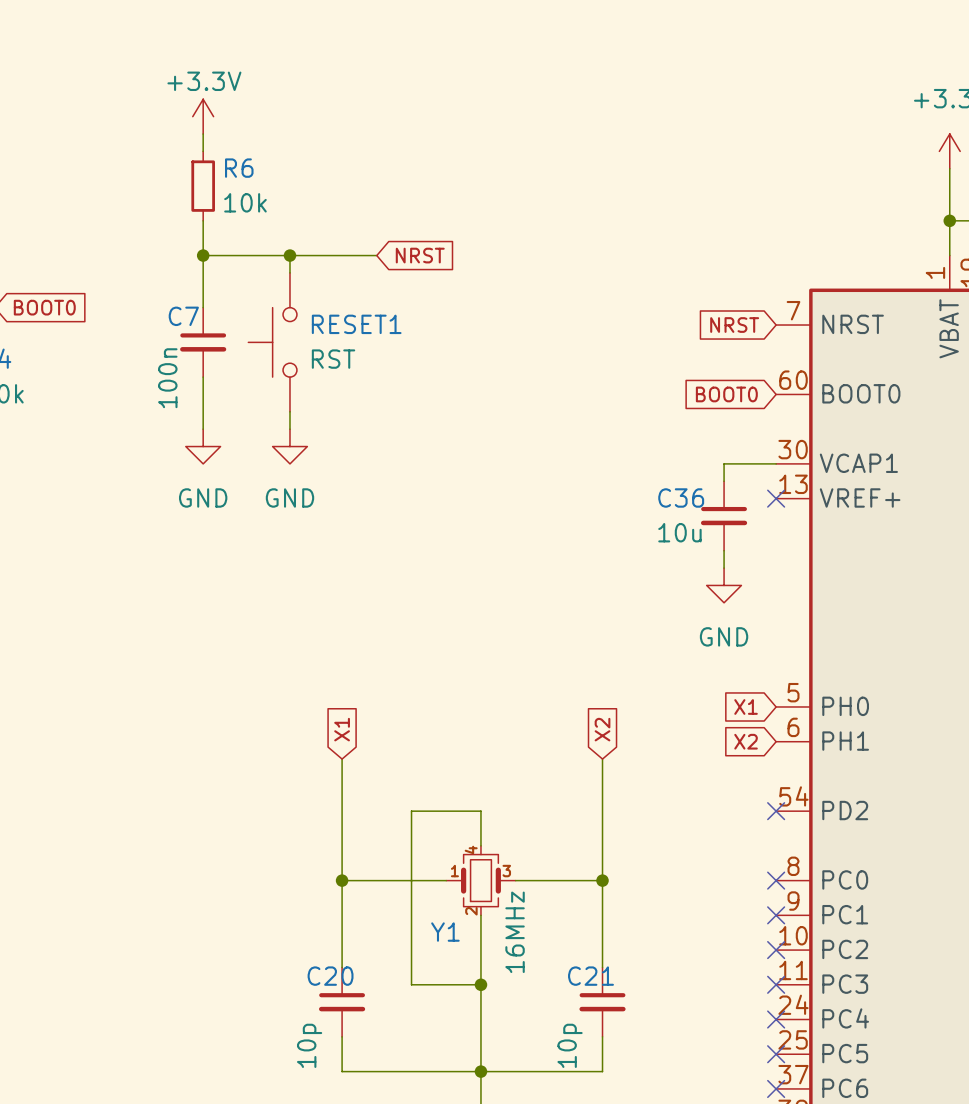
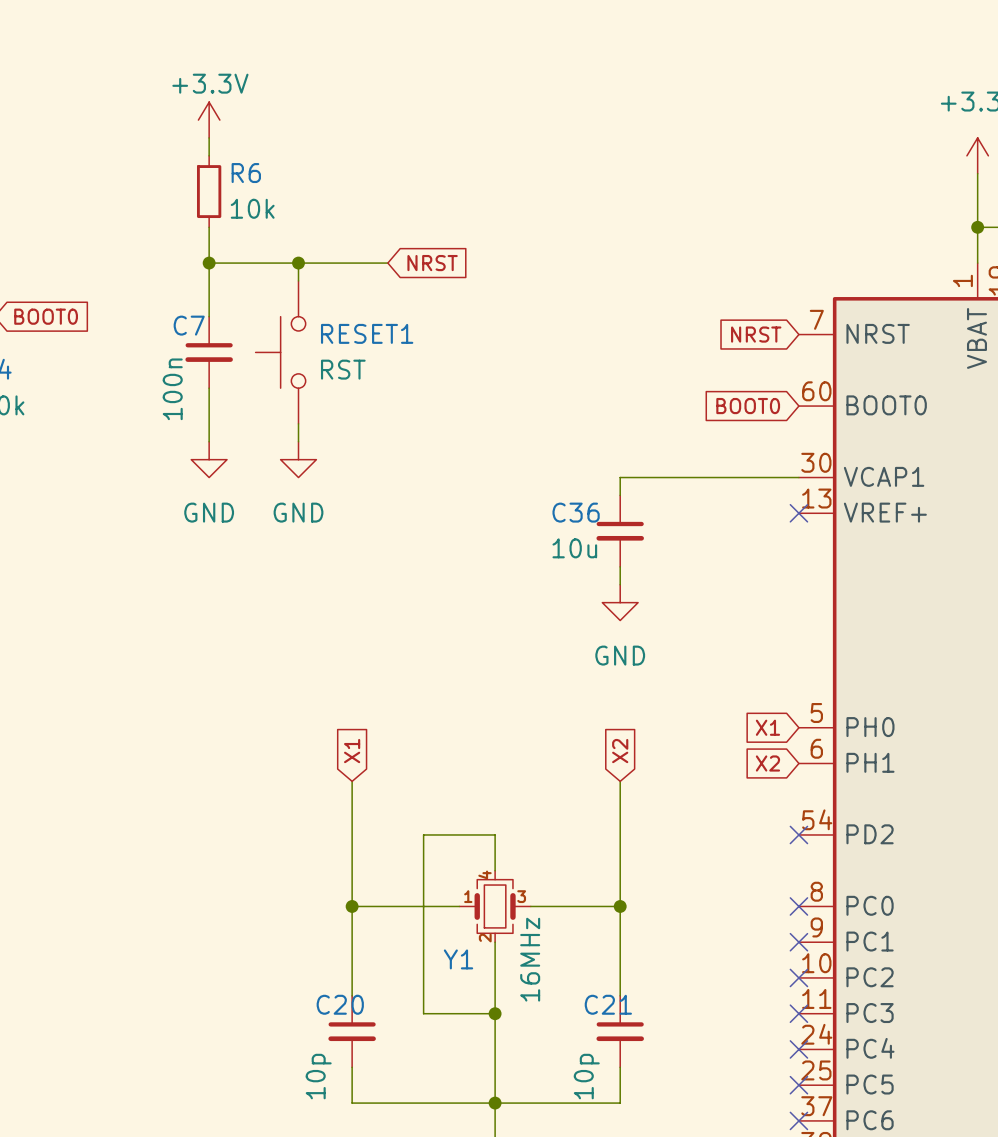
wire: (724, 463) (724, 481) -> (745, 477) (620, 477) (620, 495)
C36 position: (724, 516) -> (620, 531)
wire: (724, 550) (724, 568) -> (620, 566) (620, 584)
power symbol position: GND (724, 585) -> GND (620, 602)

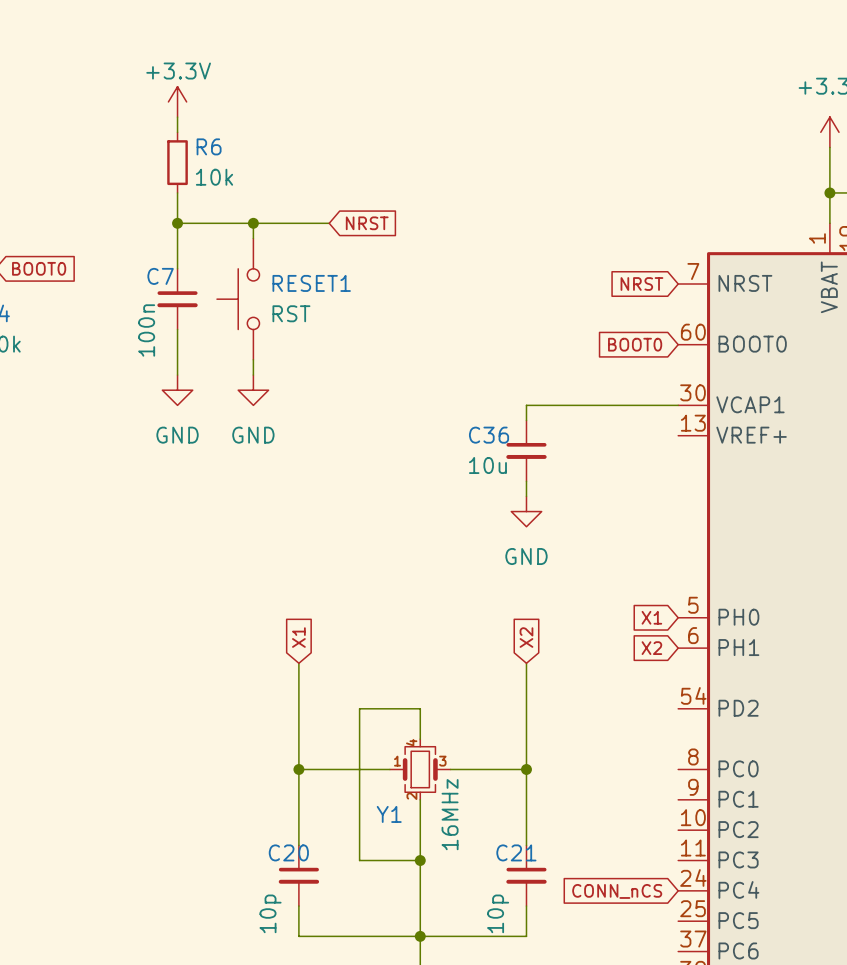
no-connect mark: (798, 513) -> none
no-connect mark: (798, 834) -> none
no-connect mark: (798, 906) -> none
no-connect mark: (798, 942) -> none
no-connect mark: (798, 977) -> none
no-connect mark: (798, 1013) -> none
no-connect mark: (798, 1049) -> none
global label: none -> CONN_nCS (617, 891)
no-connect mark: (798, 1085) -> none
no-connect mark: (798, 1120) -> none

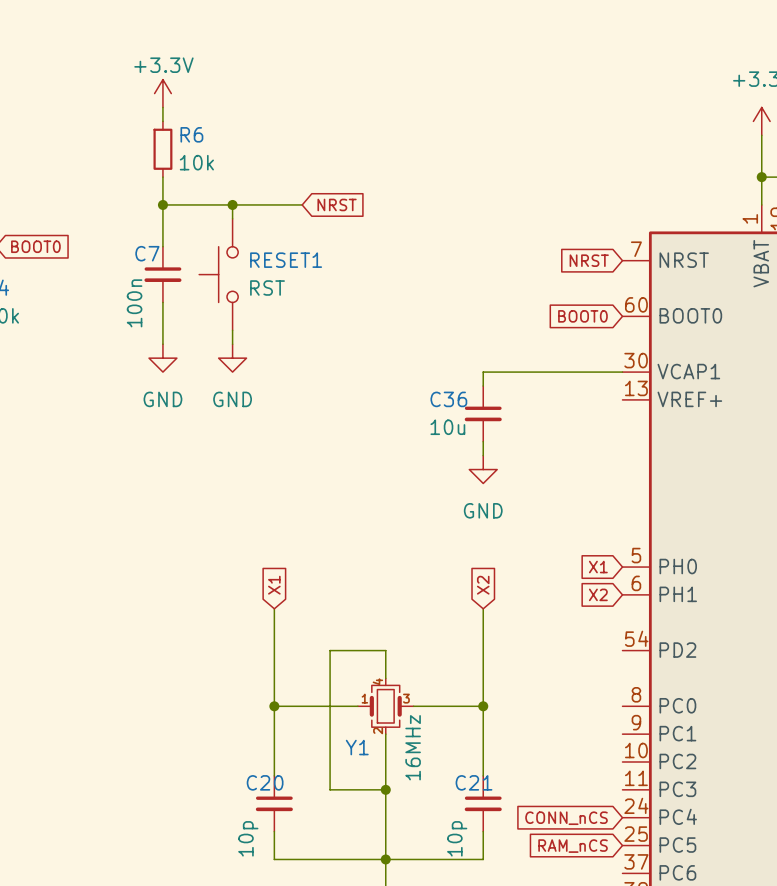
global label: none -> RAM_nCS (573, 846)

